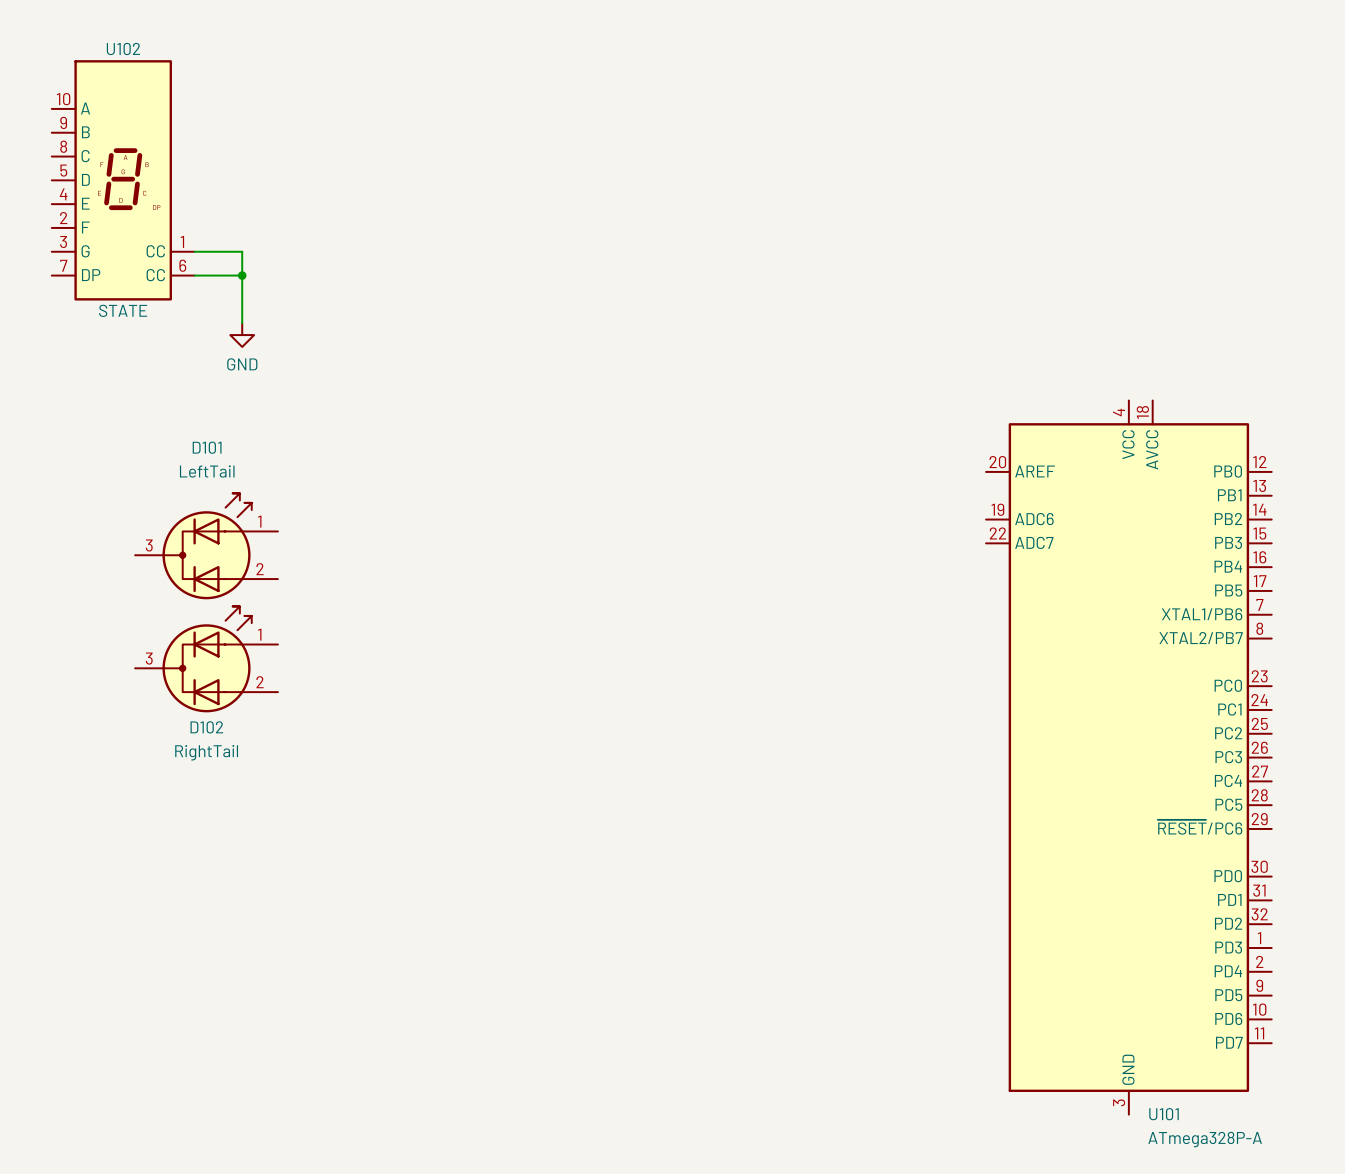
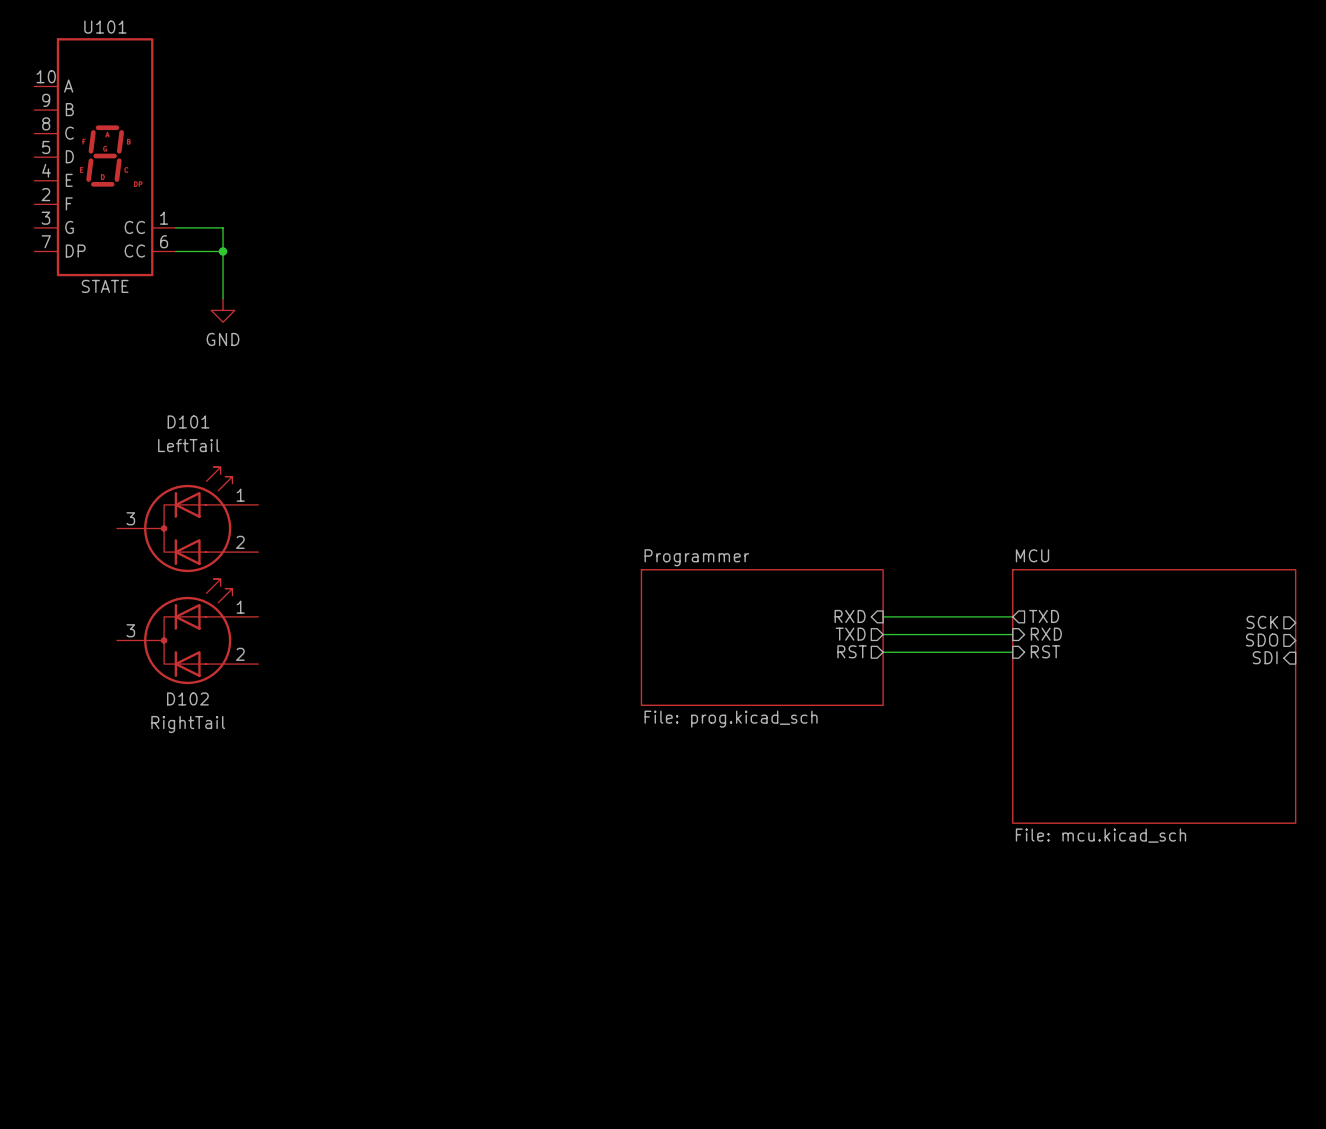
U102 name: U102 (123, 48) -> U101 (105, 27)
sheet pin: none -> RXD (850, 616)
wire: none -> (883, 616) (1012, 616)
sheet pin: none -> TXD (1044, 616)
sheet pin: none -> SCK (1262, 622)
sheet pin: none -> TXD (850, 634)
sheet pin: none -> RXD (1046, 634)
wire: none -> (883, 634) (1012, 634)
sheet Programmer: none -> File: prog.kicad_sch (762, 637)
sheet pin: none -> SDO (1262, 640)
sheet pin: none -> RST (852, 651)
sheet pin: none -> RST (1045, 651)
wire: none -> (883, 652) (1012, 652)
sheet pin: none -> SDI (1265, 657)
sheet MCU: none -> File: mcu.kicad_sch (1154, 696)
U101: ATmega328P-A (1128, 757) -> none

